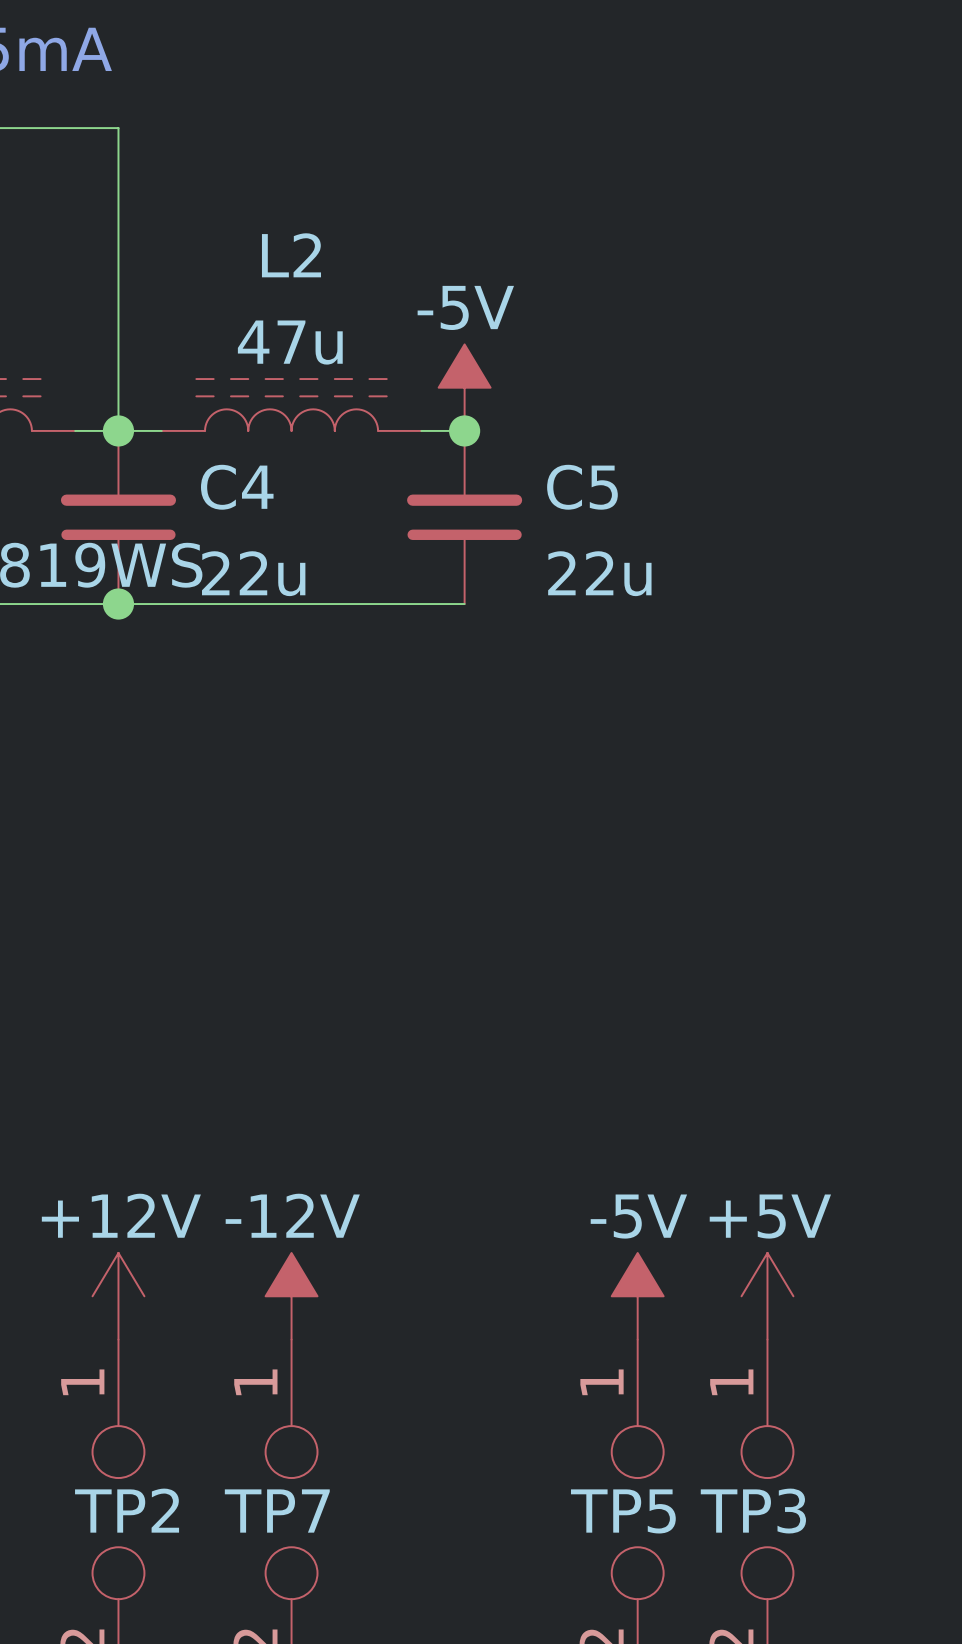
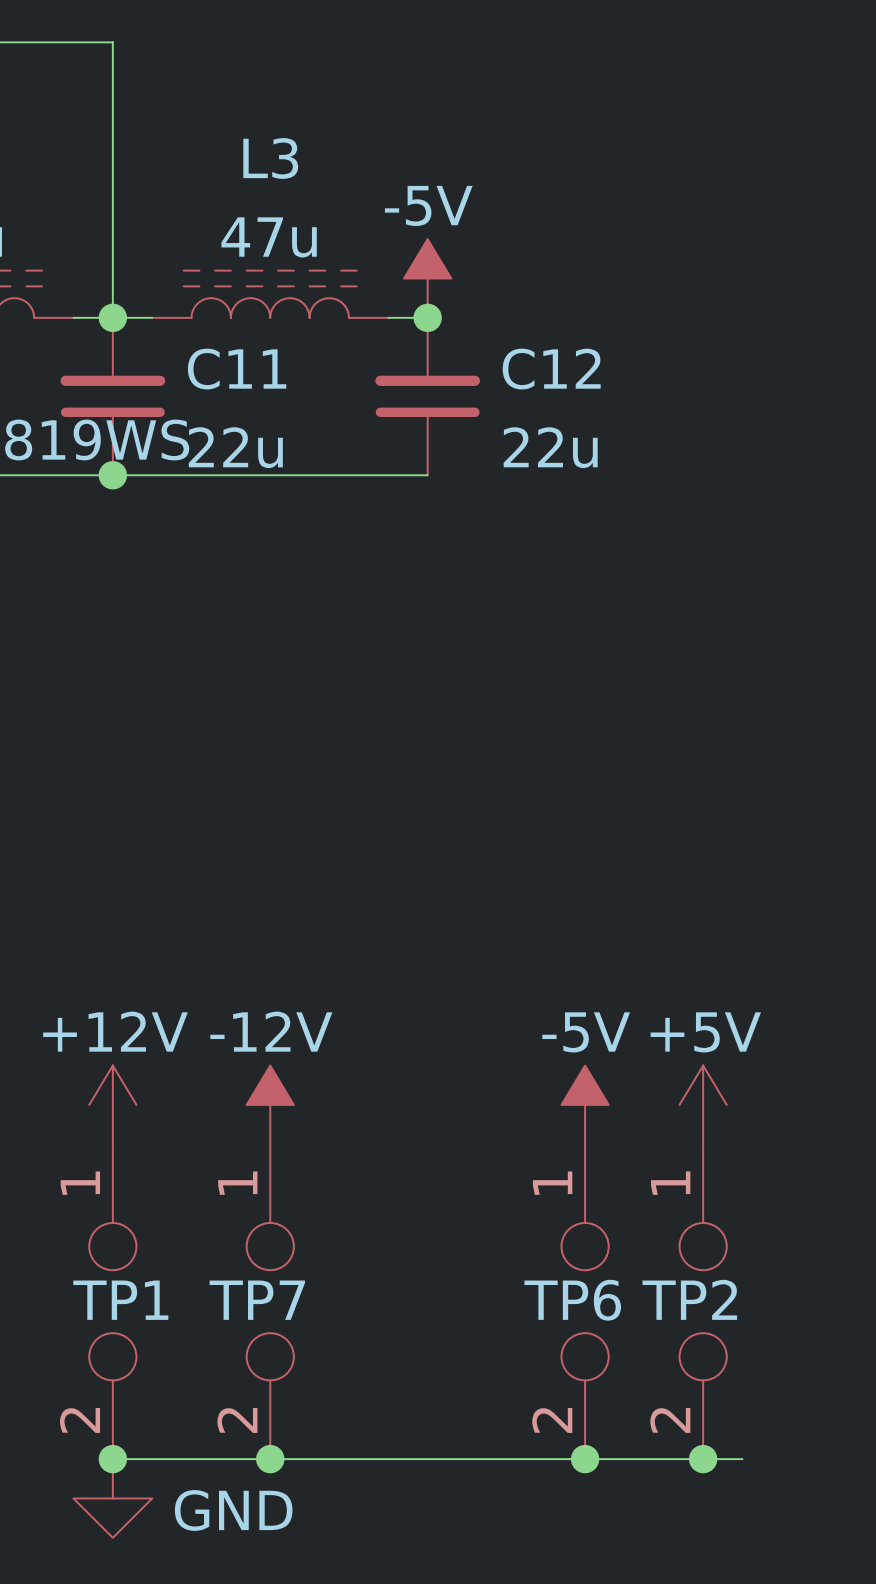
L2 name: L2 (291, 255) -> L3 (270, 158)
C4 name: C4 (237, 487) -> C11 (237, 369)
C5 name: C5 (582, 487) -> C12 (551, 369)
TP2 name: TP2 (127, 1510) -> TP1 (120, 1300)
TP5 name: TP5 (623, 1511) -> TP6 (572, 1300)
TP3 name: TP3 (753, 1511) -> TP2 (689, 1299)

